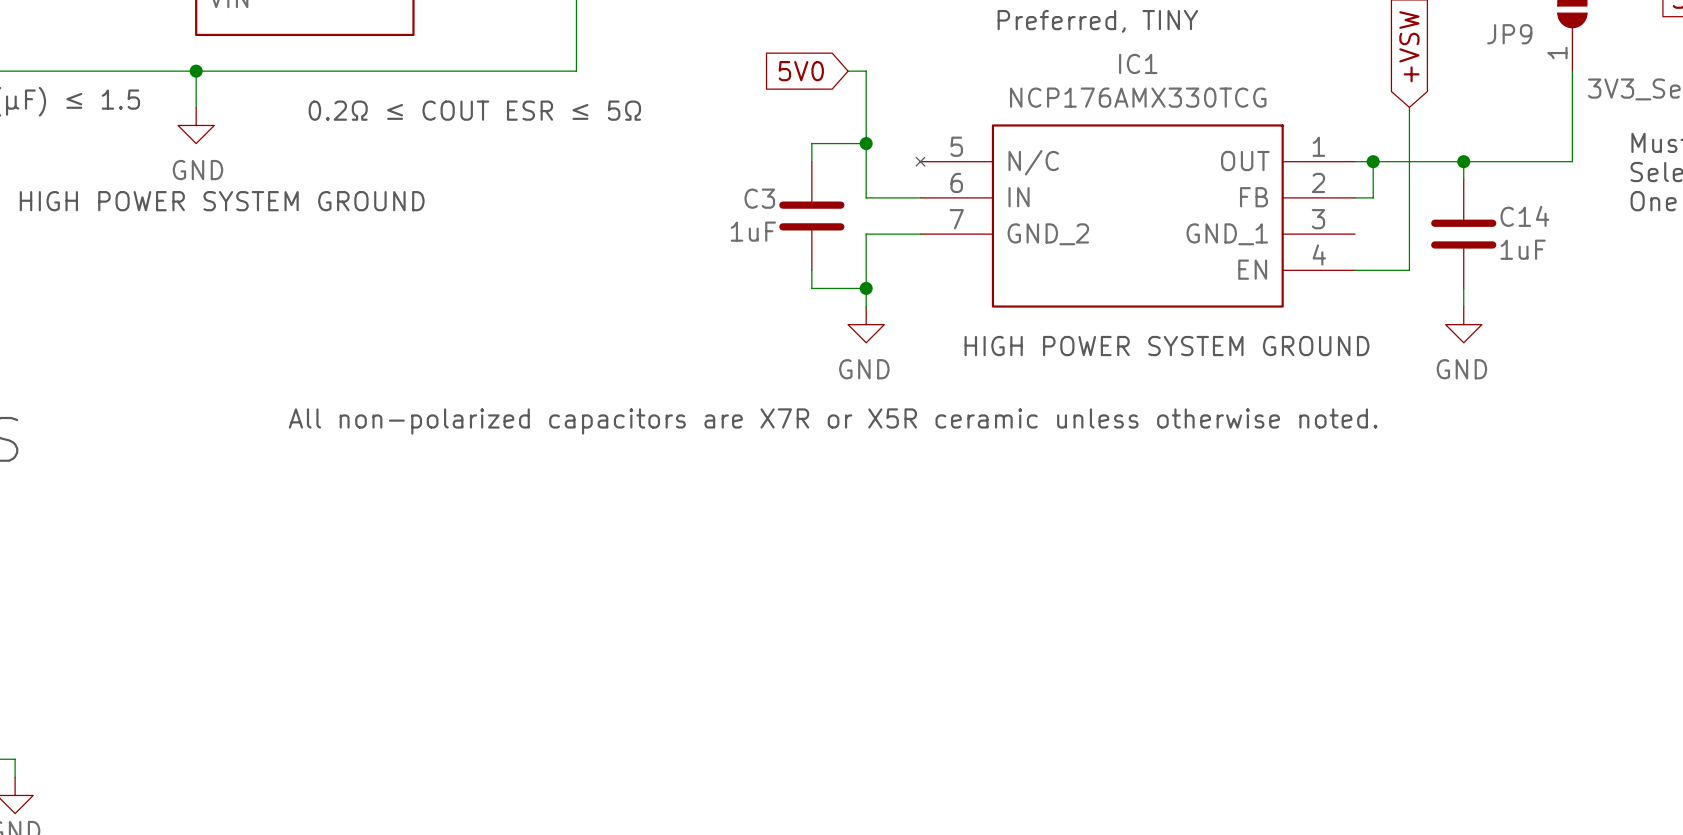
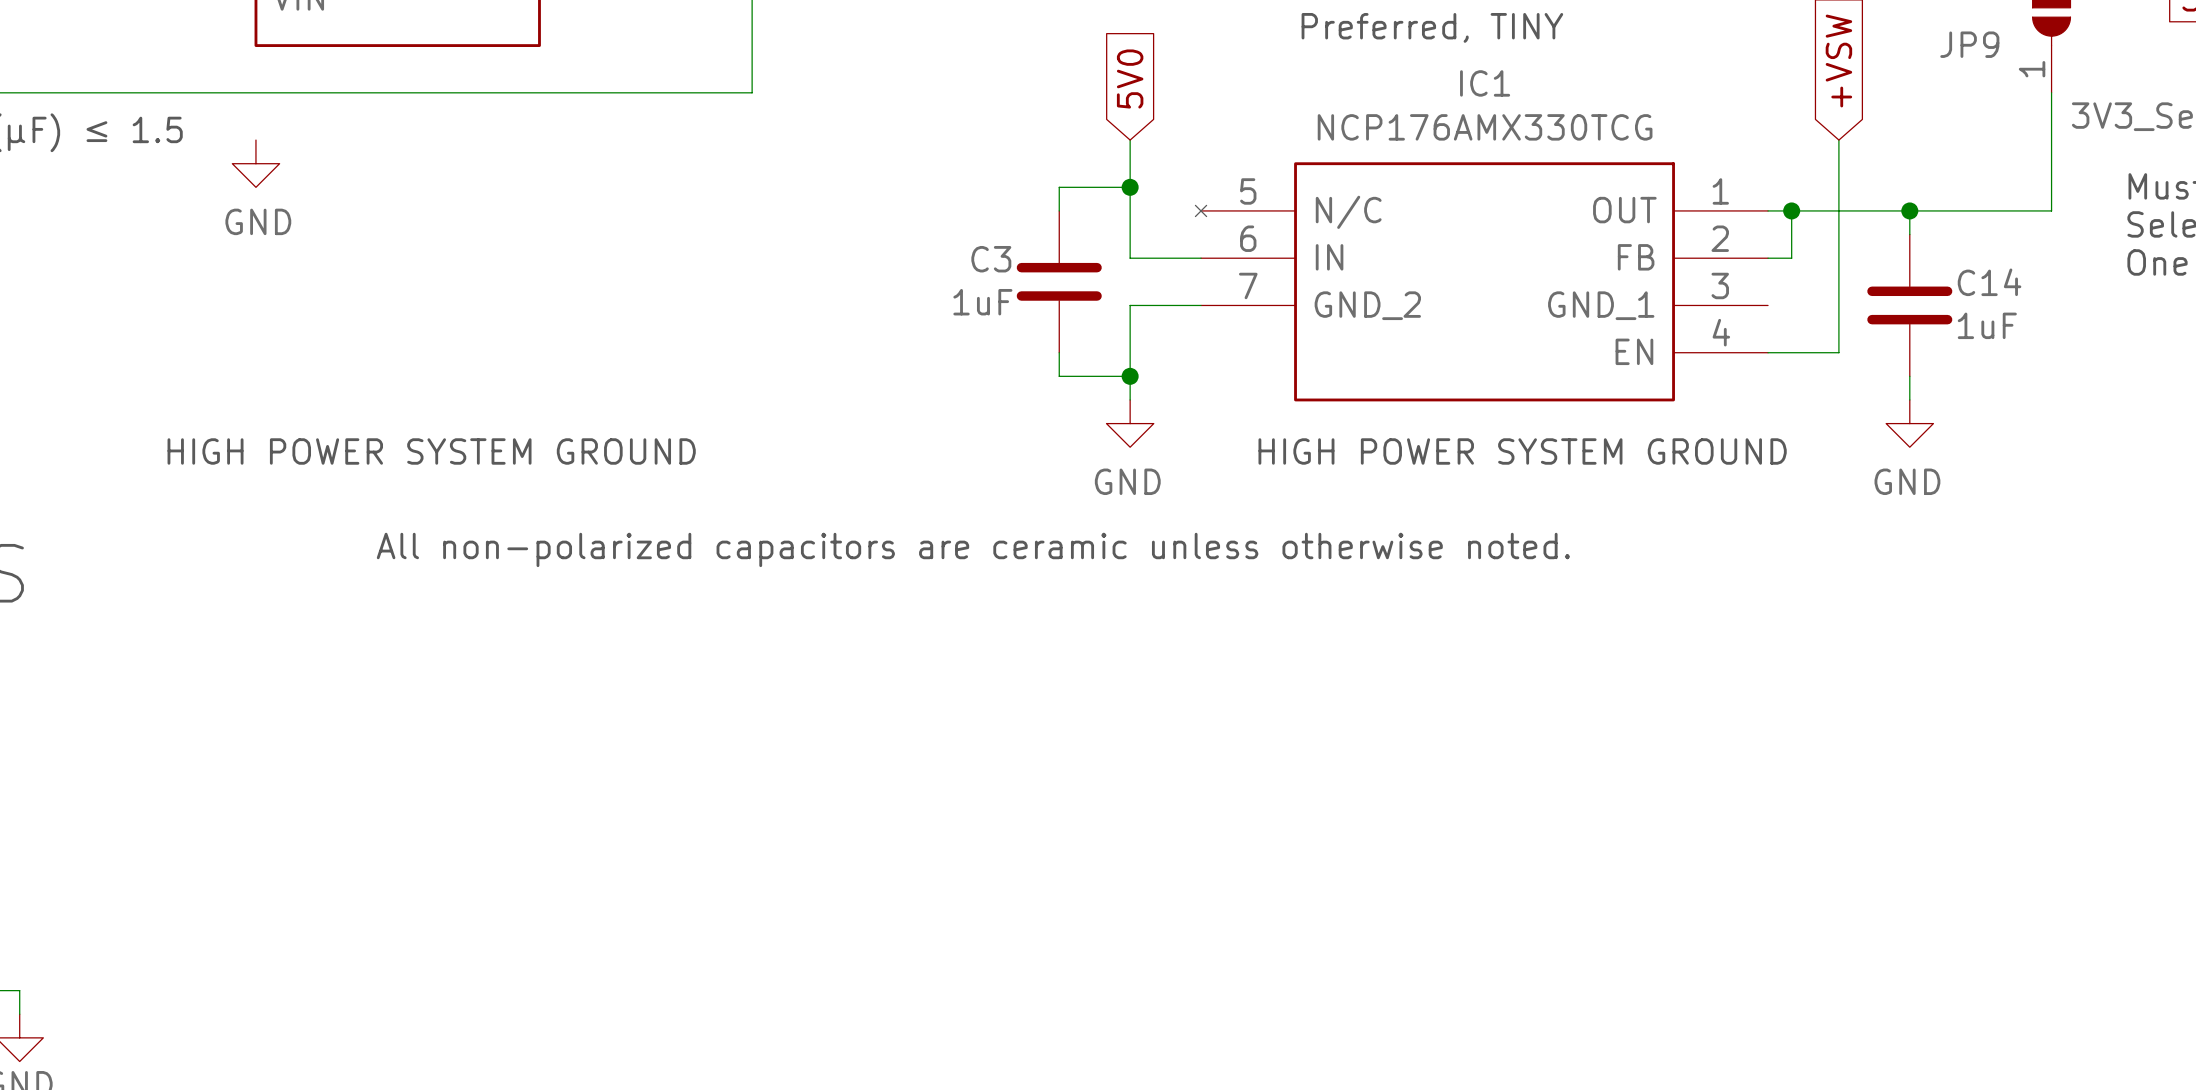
wire: (196, 71) (196, 107) -> none
junction: (196, 71) -> none
global label rotation: 0° (801, 71) -> 90° clockwise (1130, 79)
wire: (848, 71) (866, 71) (866, 107) -> none
text: 0.2Ω ≤ COUT ESR ≤ 5Ω (474, 110) -> none
text position: HIGH POWER SYSTEM GROUND (222, 201) -> HIGH POWER SYSTEM GROUND (431, 451)
text: All non-polarized capacitors are X7R or X5R ceramic unless otherwise noted. (833, 421) -> All non-polarized capacitors are ceramic unless otherwise noted. (973, 549)

